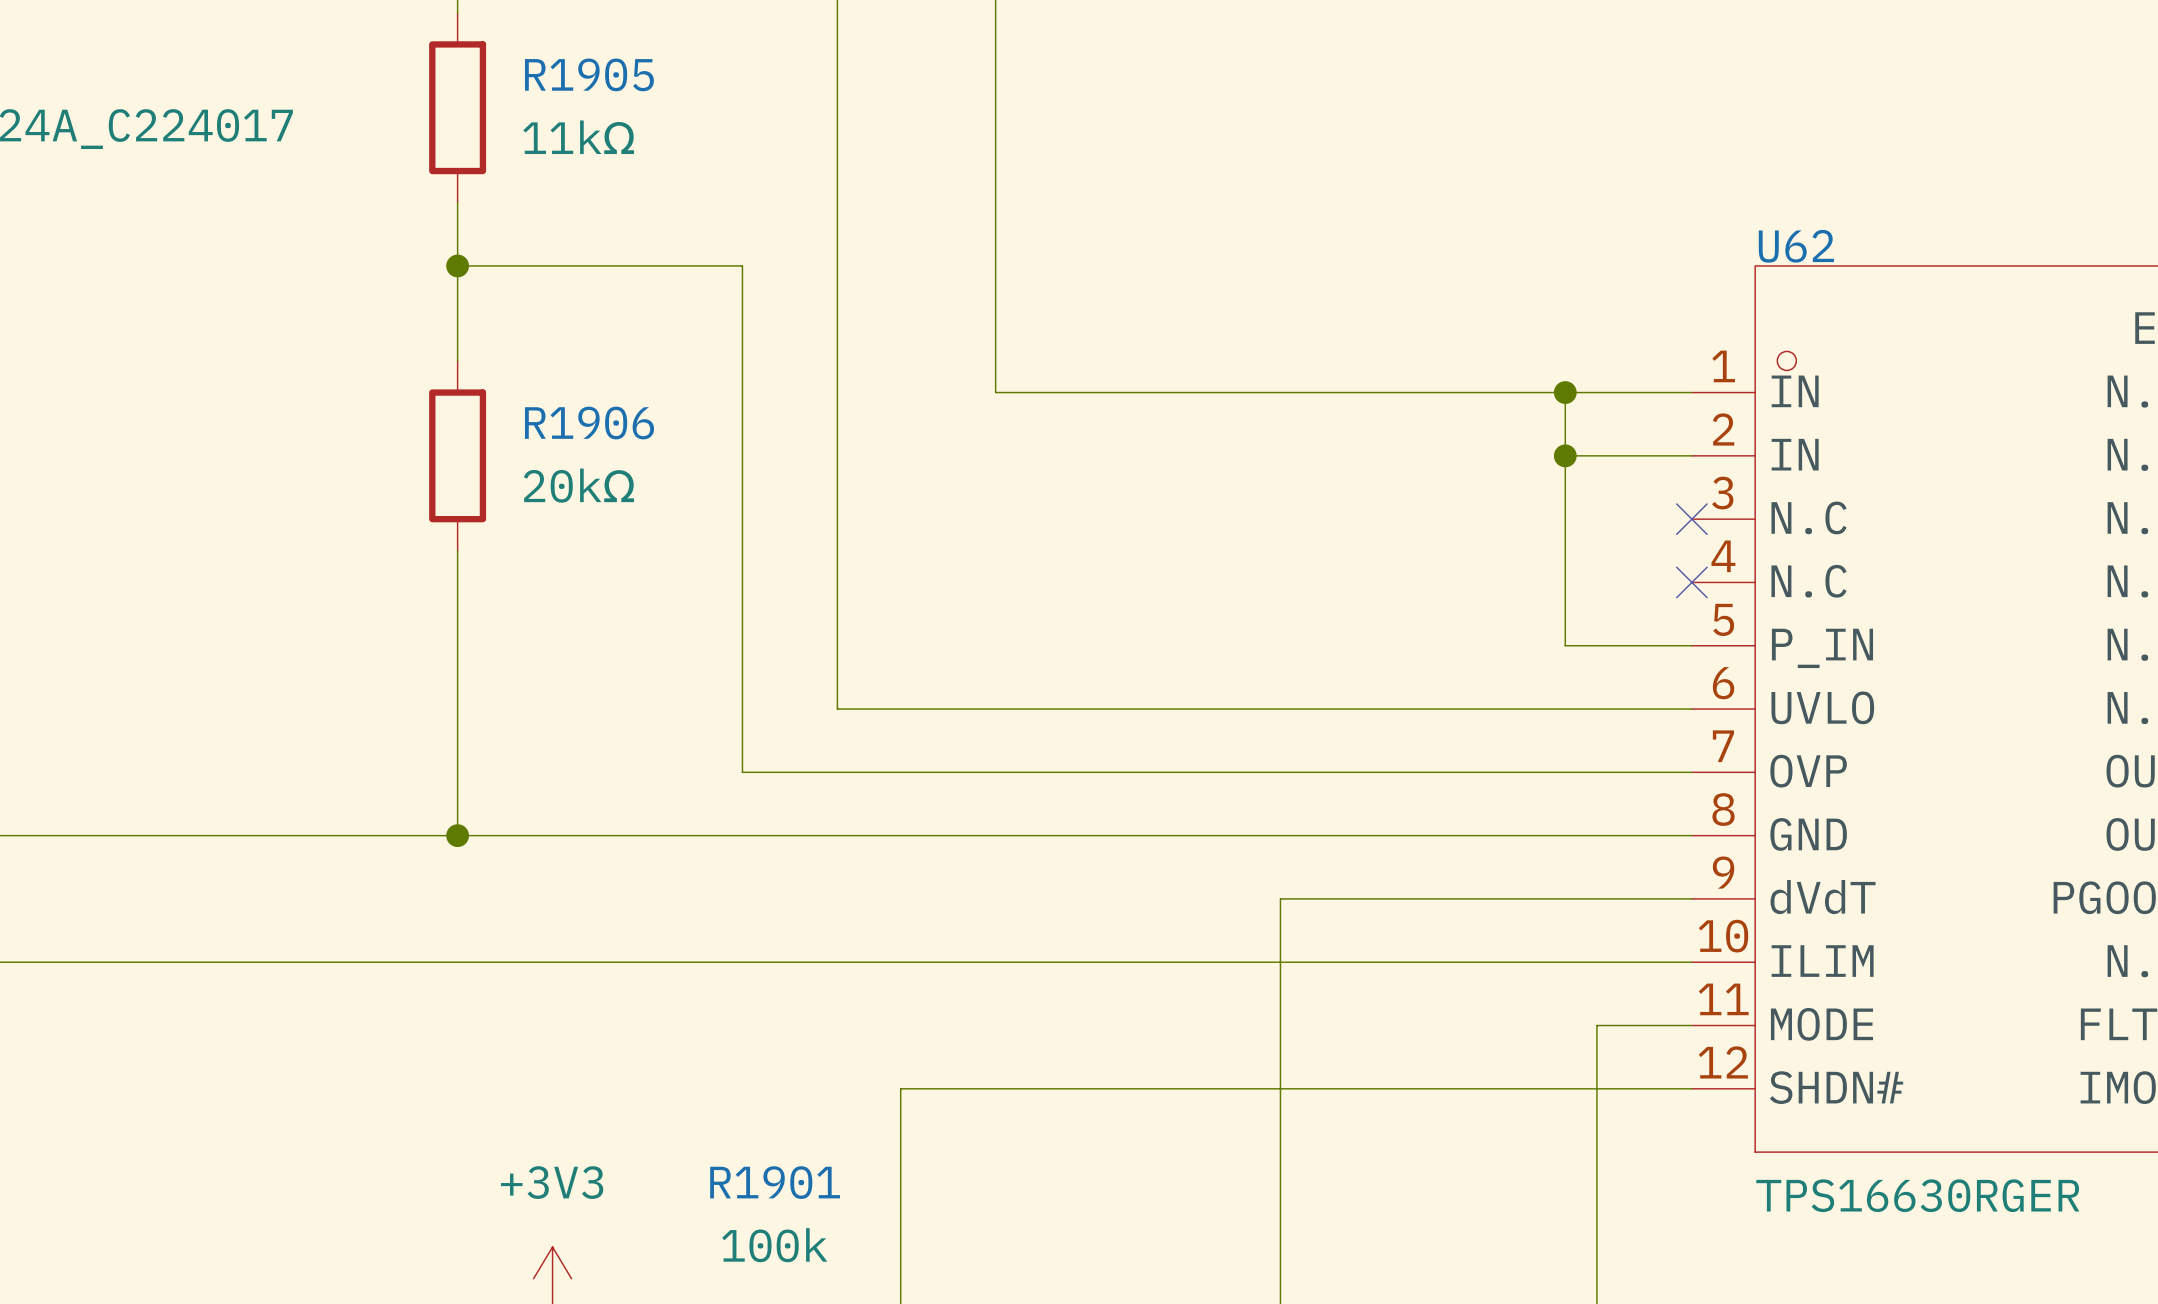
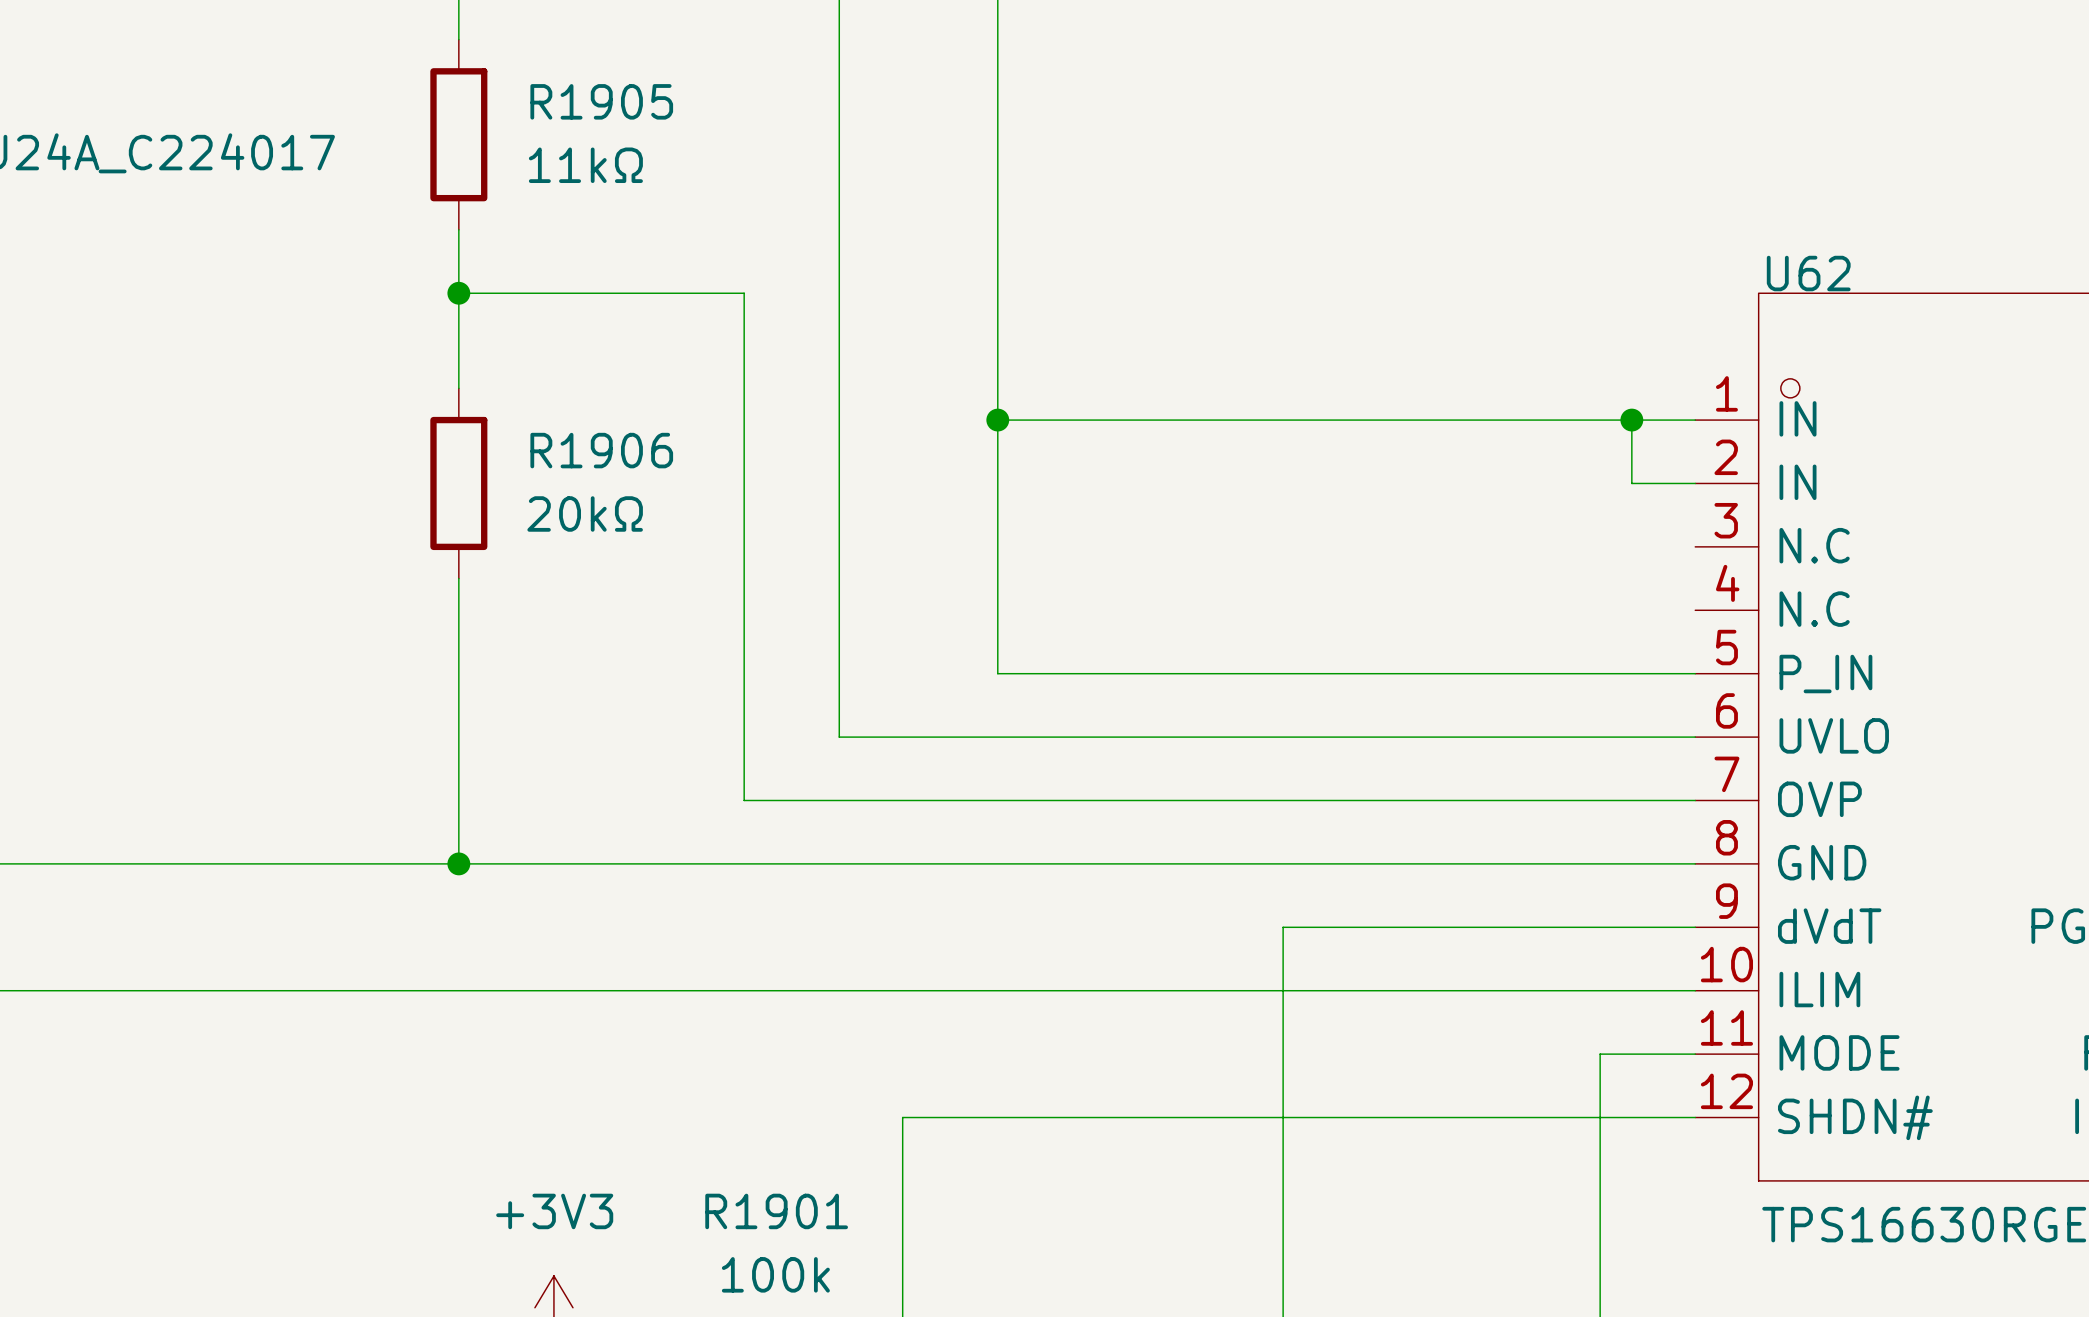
junction: none -> (997, 420)
wire: (1565, 392) (1565, 645) -> (997, 420) (997, 673) (1568, 673)
junction: (1565, 392) -> none
junction: none -> (1631, 420)
wire: (1565, 455) (1628, 455) -> (1631, 420) (1631, 483)
junction: (1565, 455) -> none
no-connect mark: (1691, 519) -> none
no-connect mark: (1691, 582) -> none

